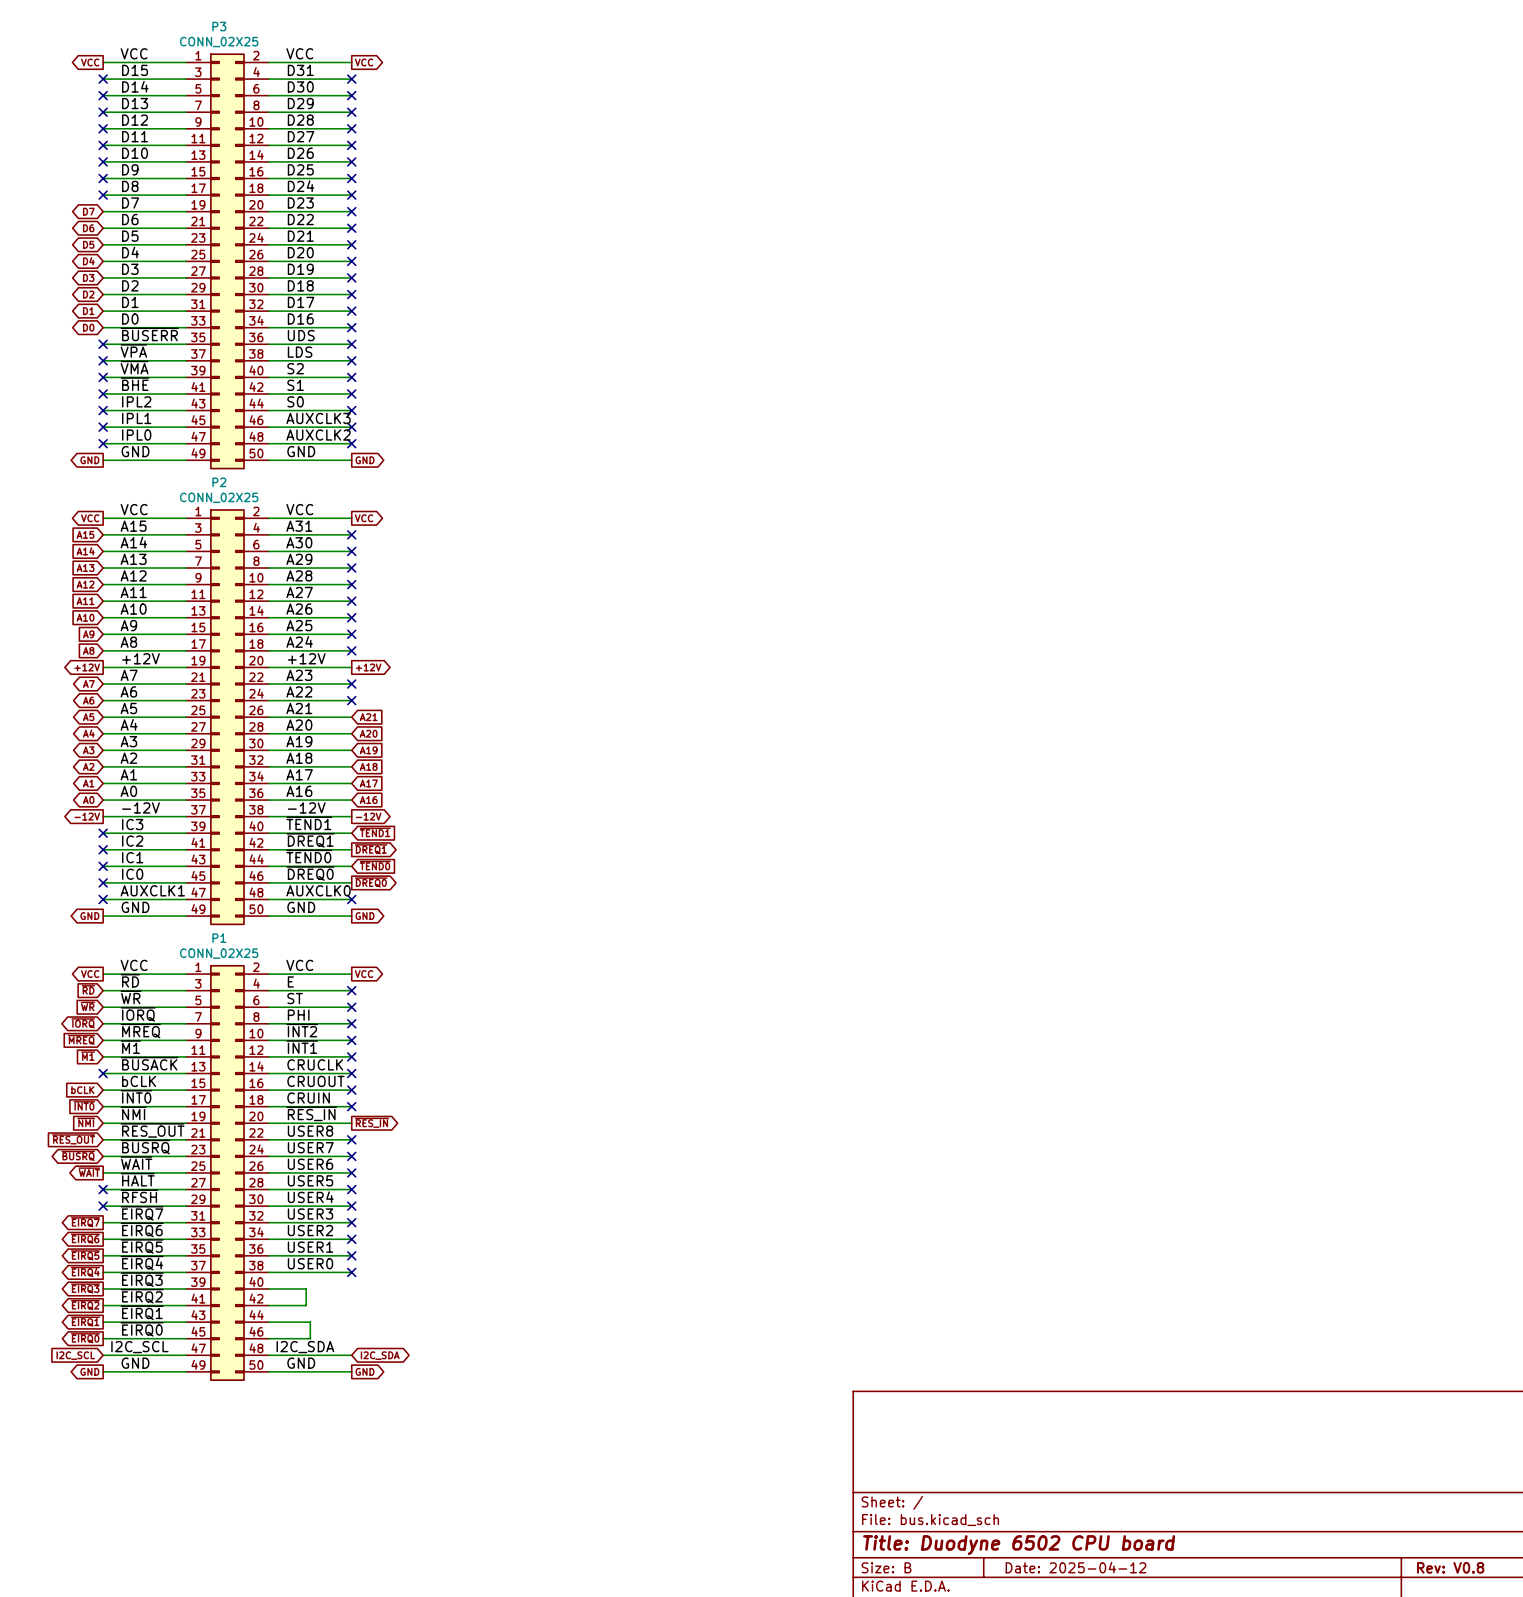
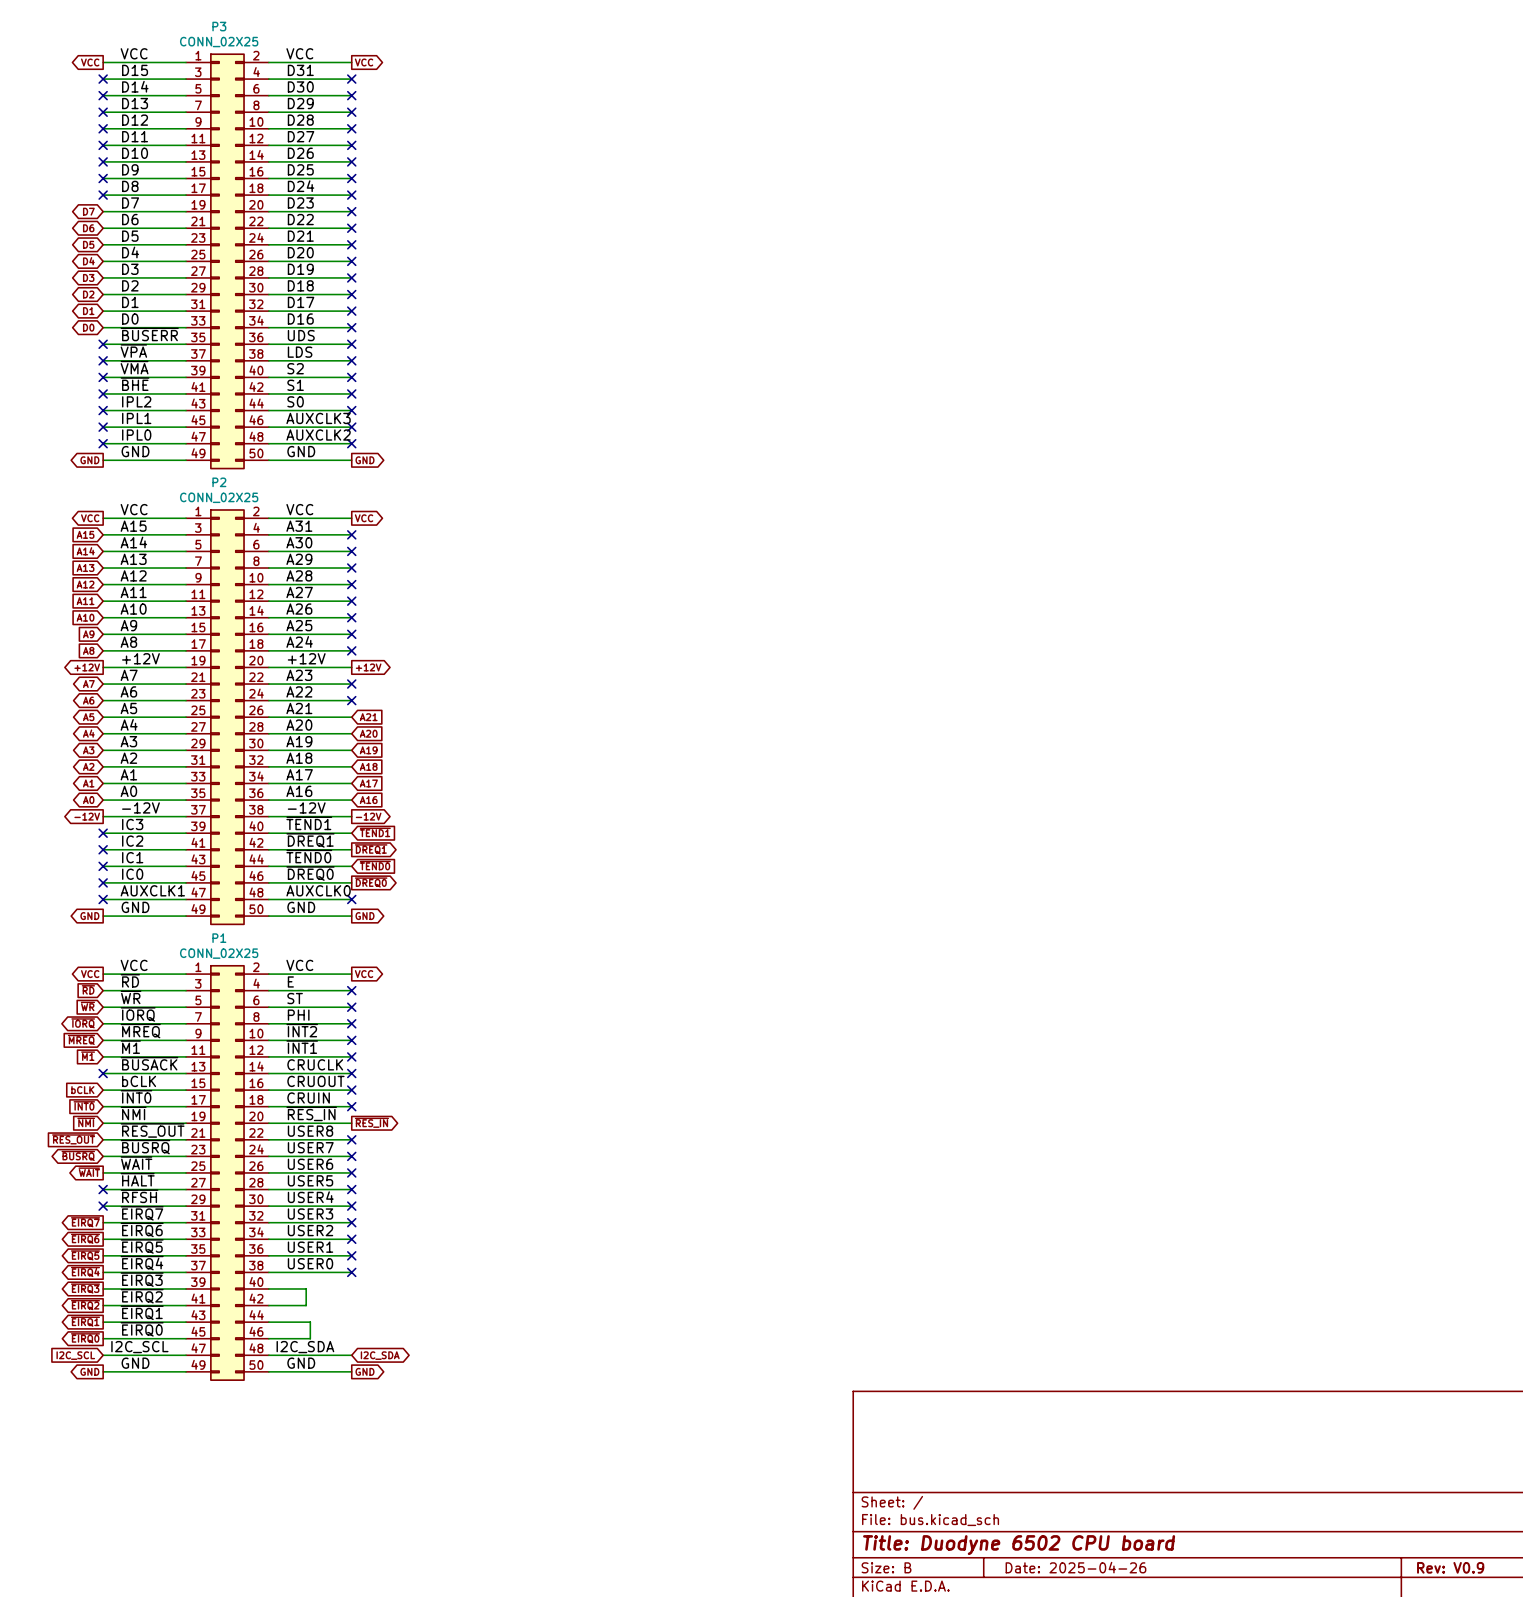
title block: Date: 2025-04-12 (1075, 1567) -> Date: 2025-04-26 (1075, 1567)
title block: Rev: V0.8 (1450, 1567) -> Rev: V0.9 (1450, 1567)

